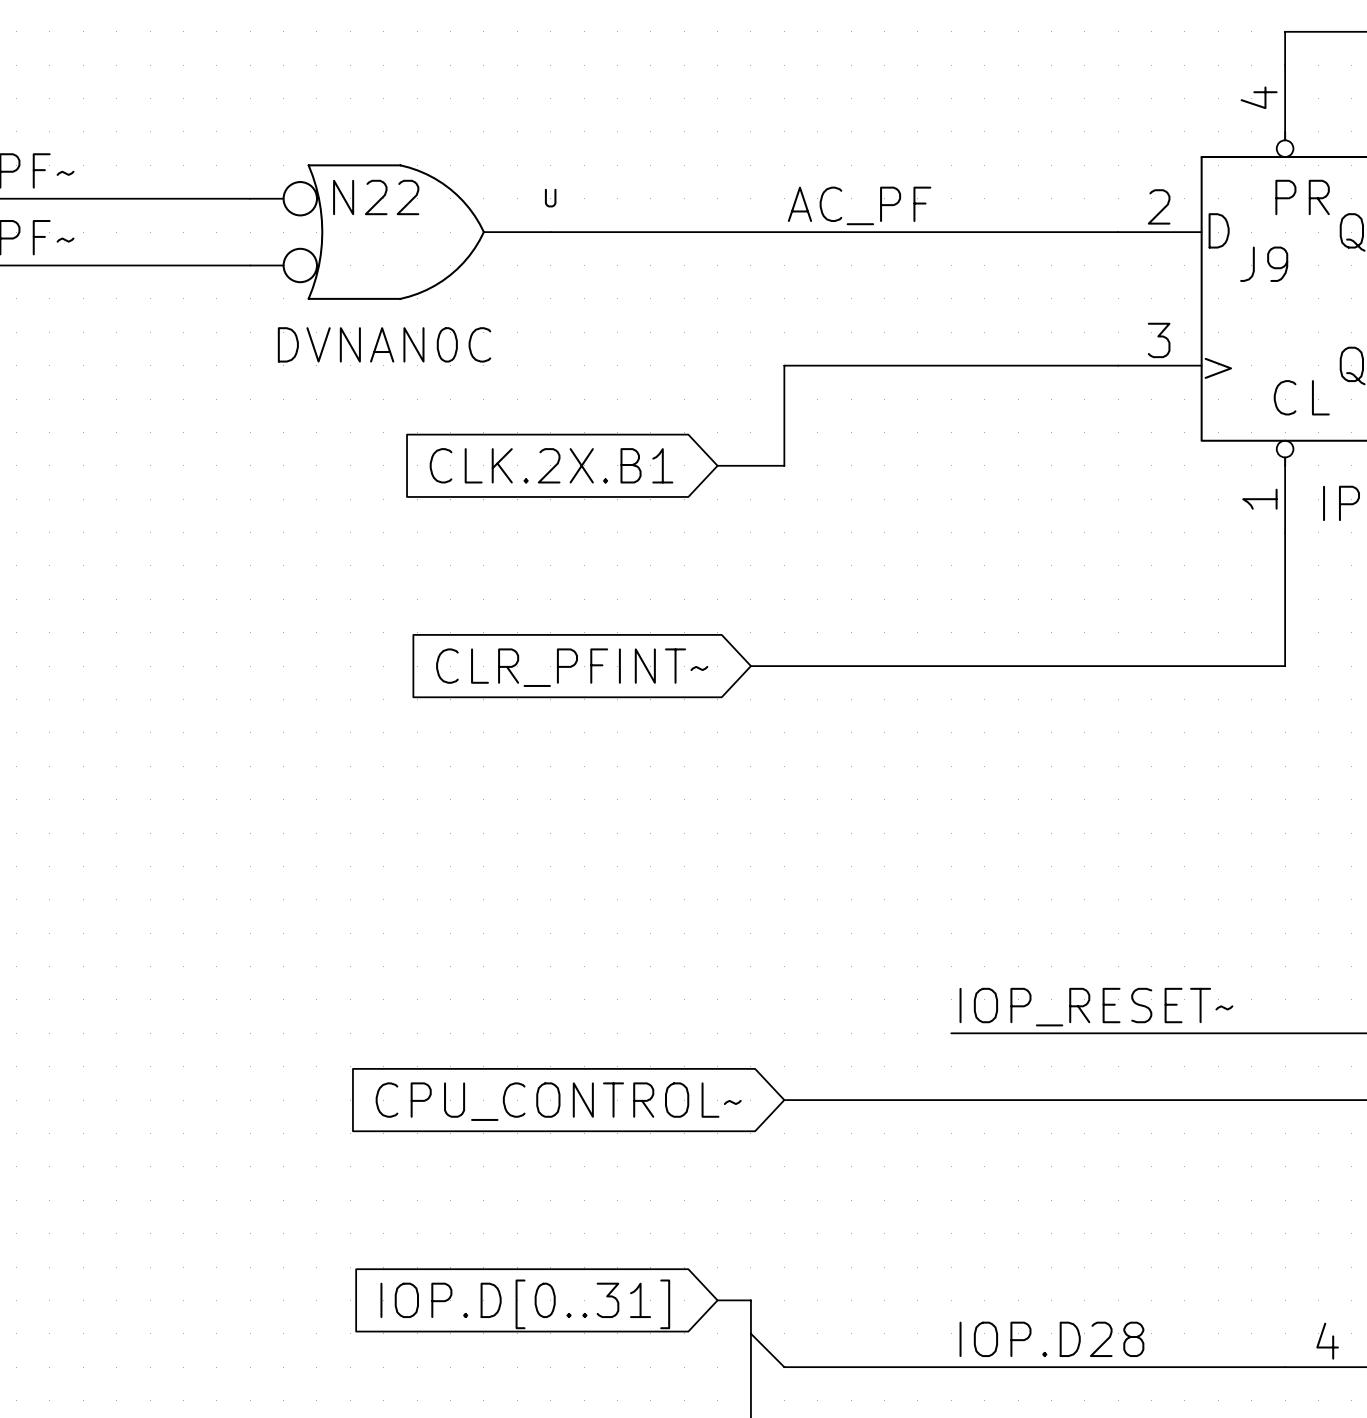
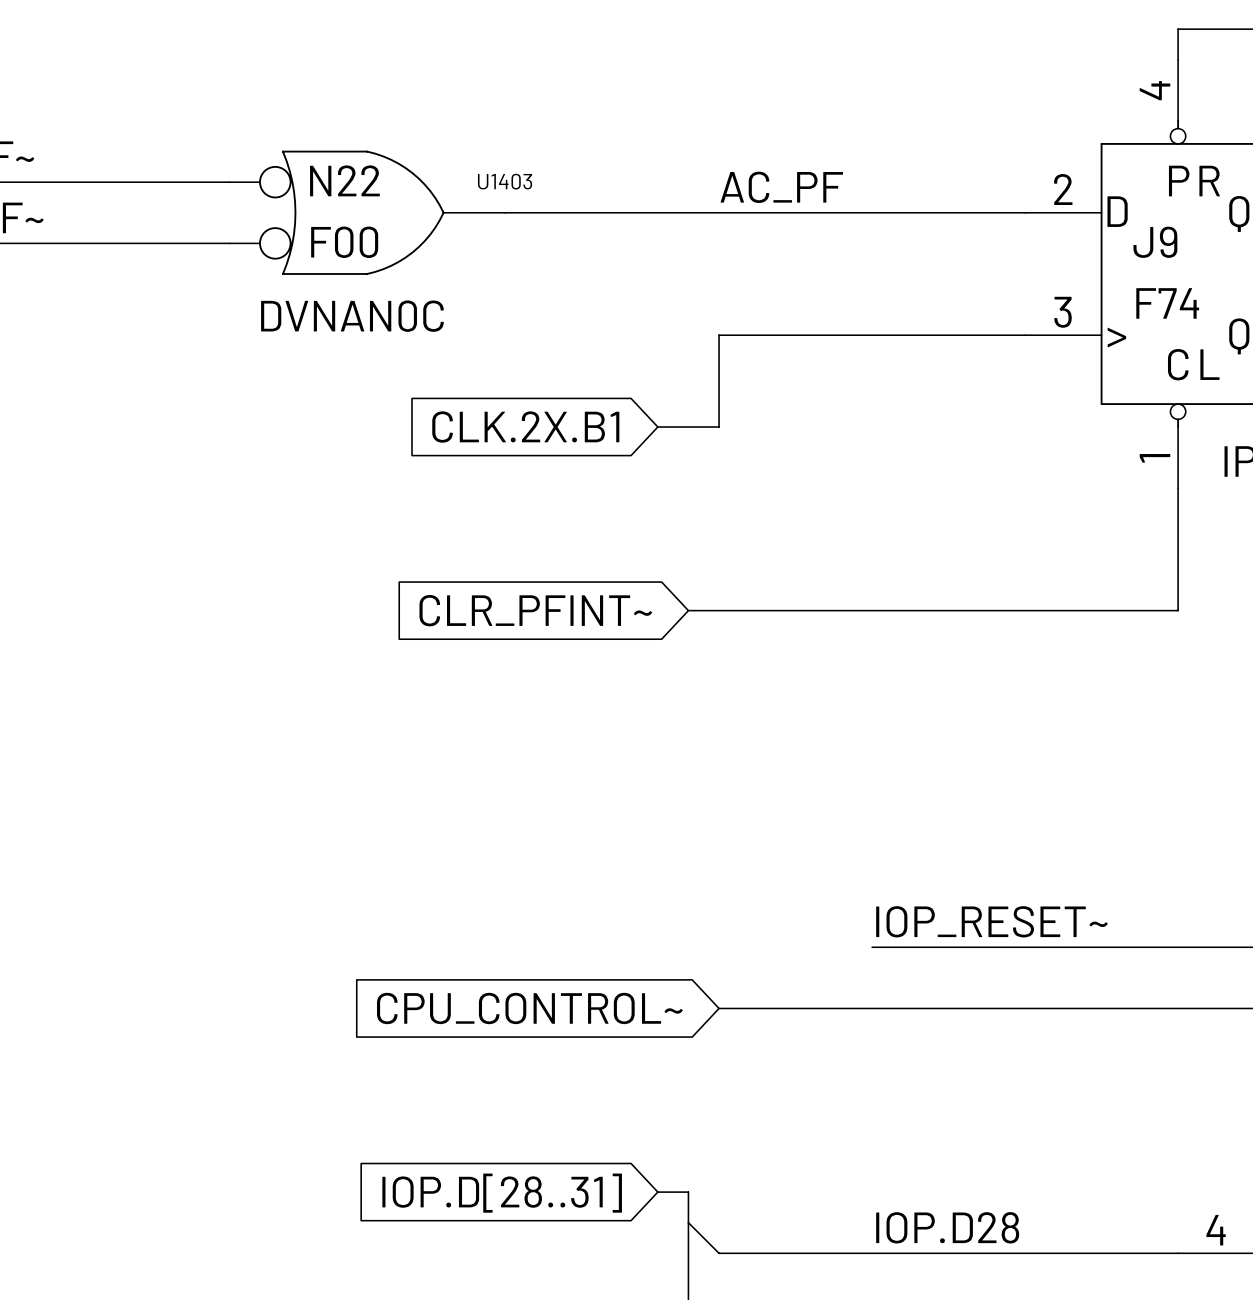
U name: U (550, 198) -> U1403 (505, 181)
U value: none -> F00 (344, 242)
part value: none -> F74 (1167, 303)
global label: IOP.D[0..31] (525, 1304) -> IOP.D[28..31] (502, 1193)

